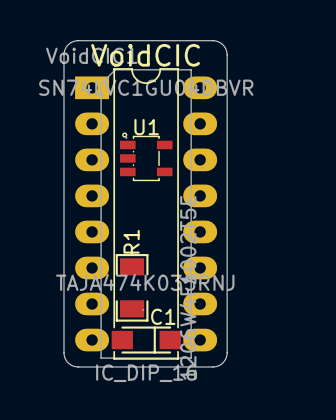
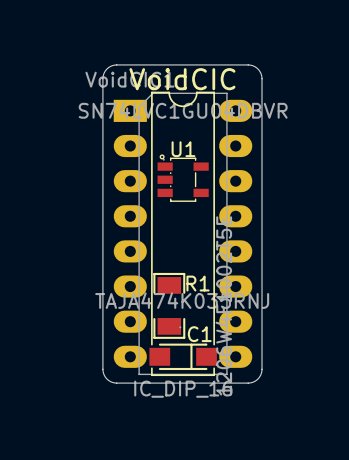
R1 name rotation: 0° (131, 241) -> 90° clockwise (198, 283)
R1 name position: R1 (131, 241) -> R1 (198, 283)

